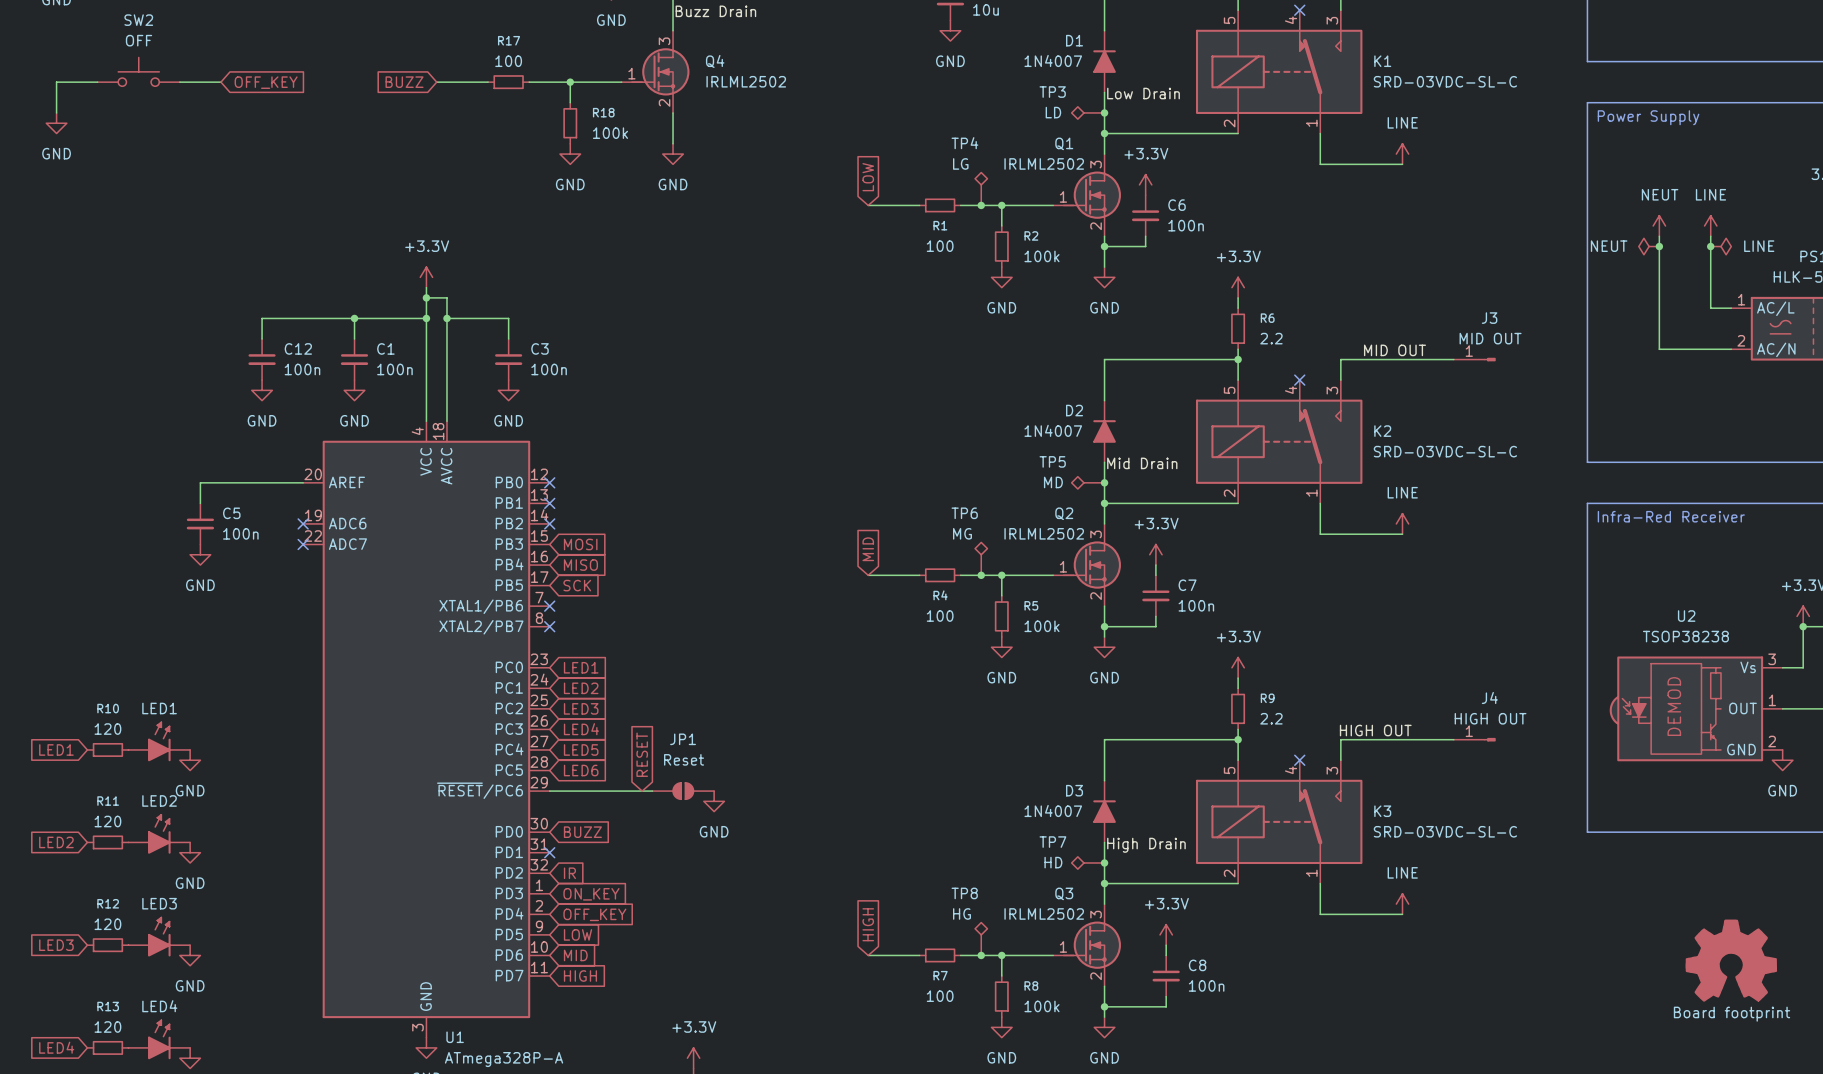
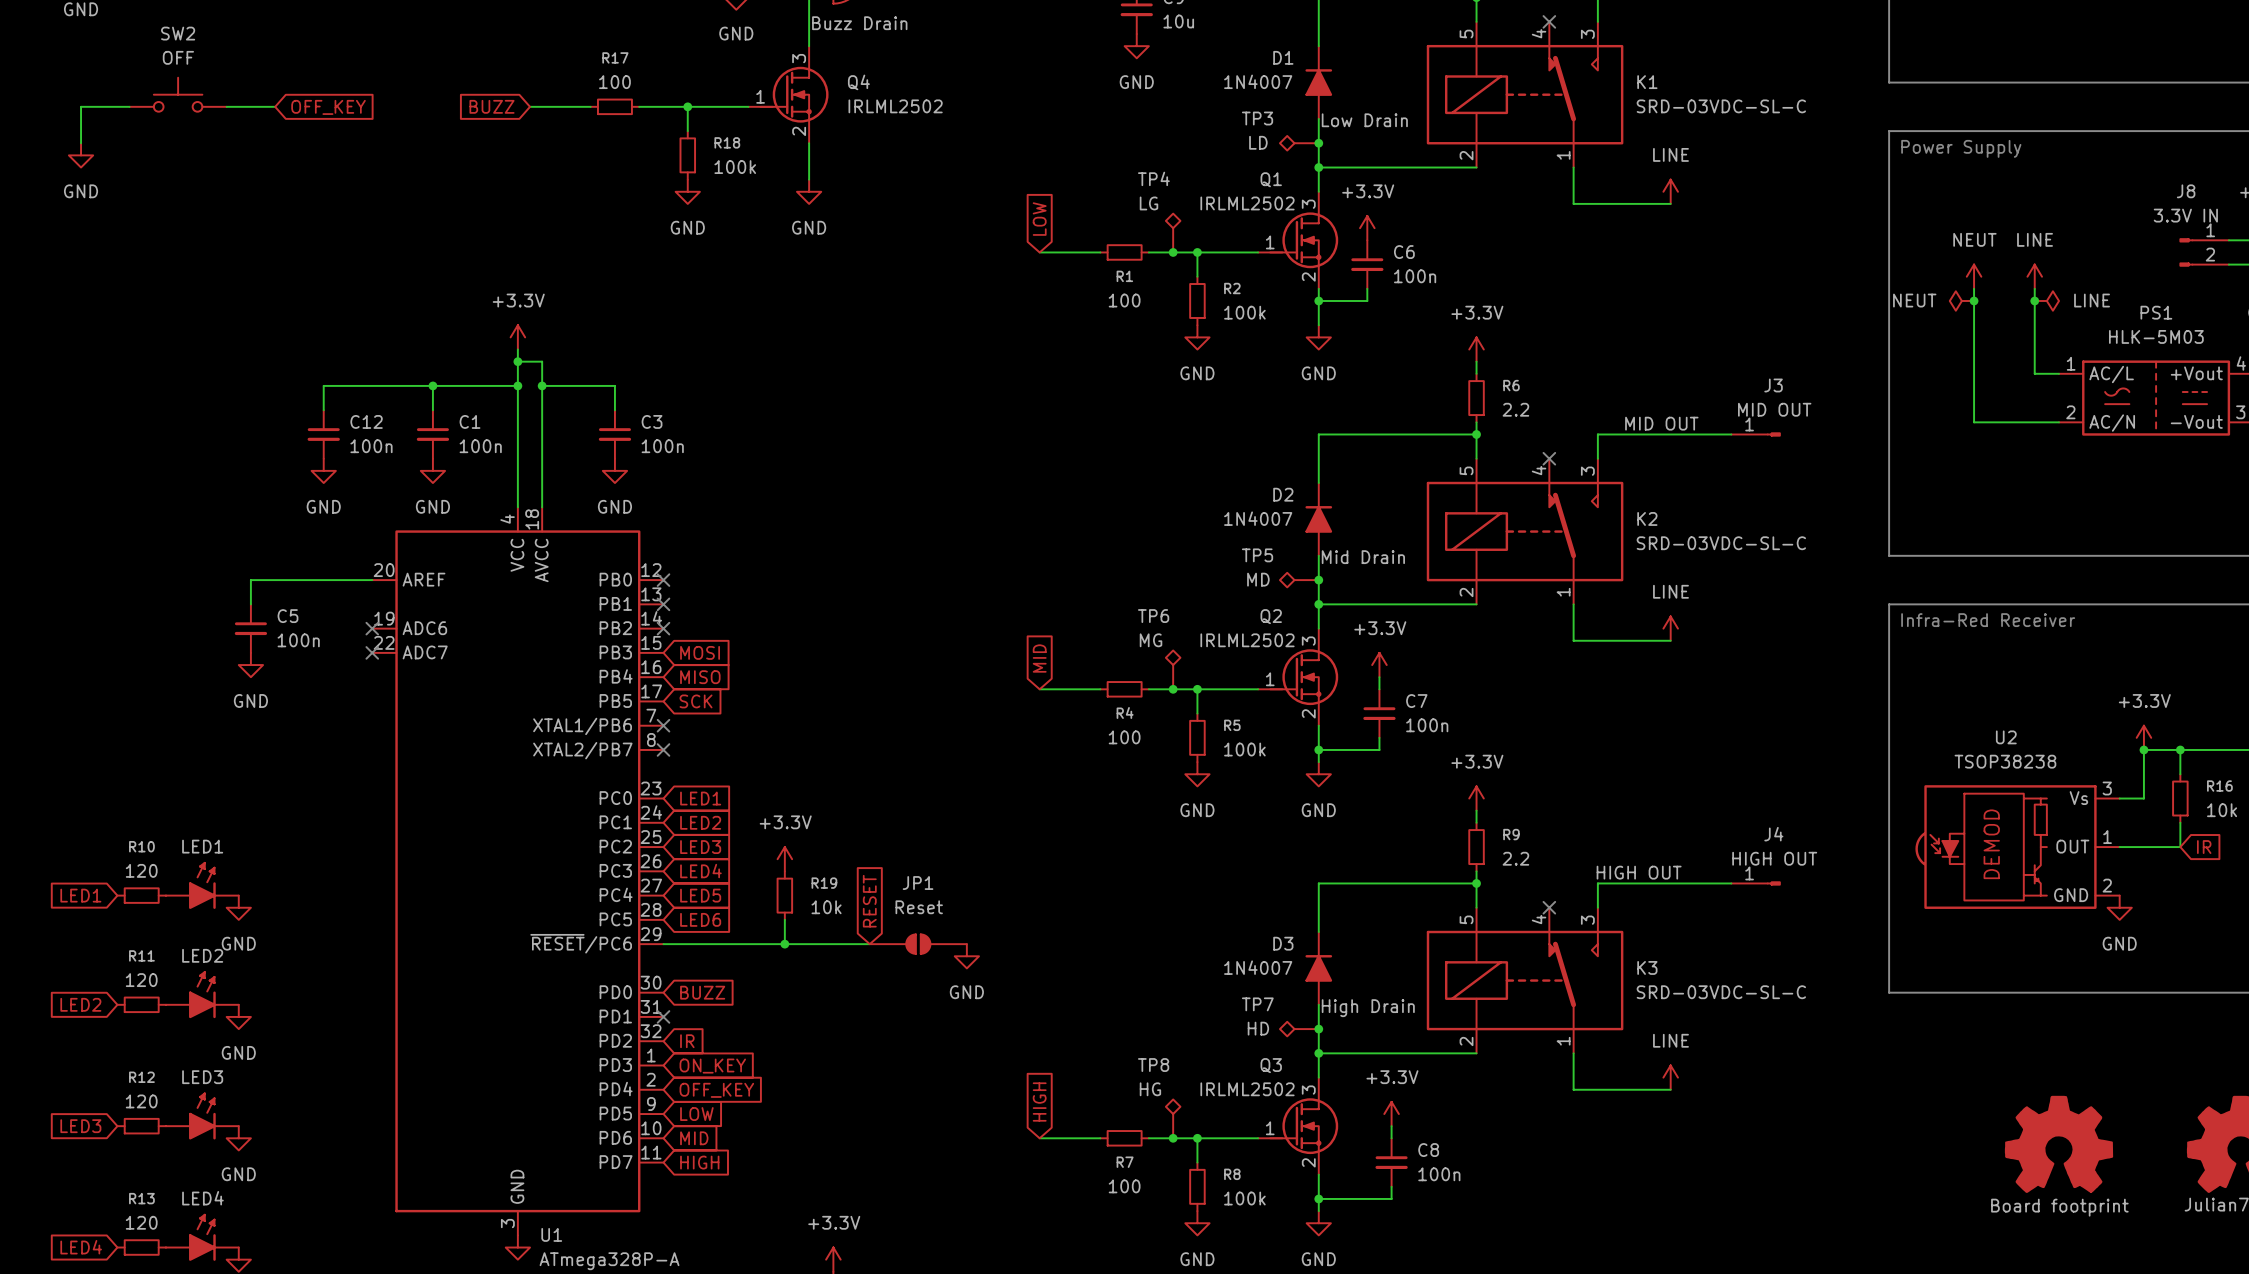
power symbol: none -> +3.3V (784, 859)
R19: none -> 10k (784, 895)
global label position: RESET (642, 754) -> RESET (869, 901)
JP1 symbol: [652, 782, 715, 800] -> [869, 933, 967, 955]
junction: none -> (784, 944)
power symbol position: GND (714, 801) -> GND (966, 956)

